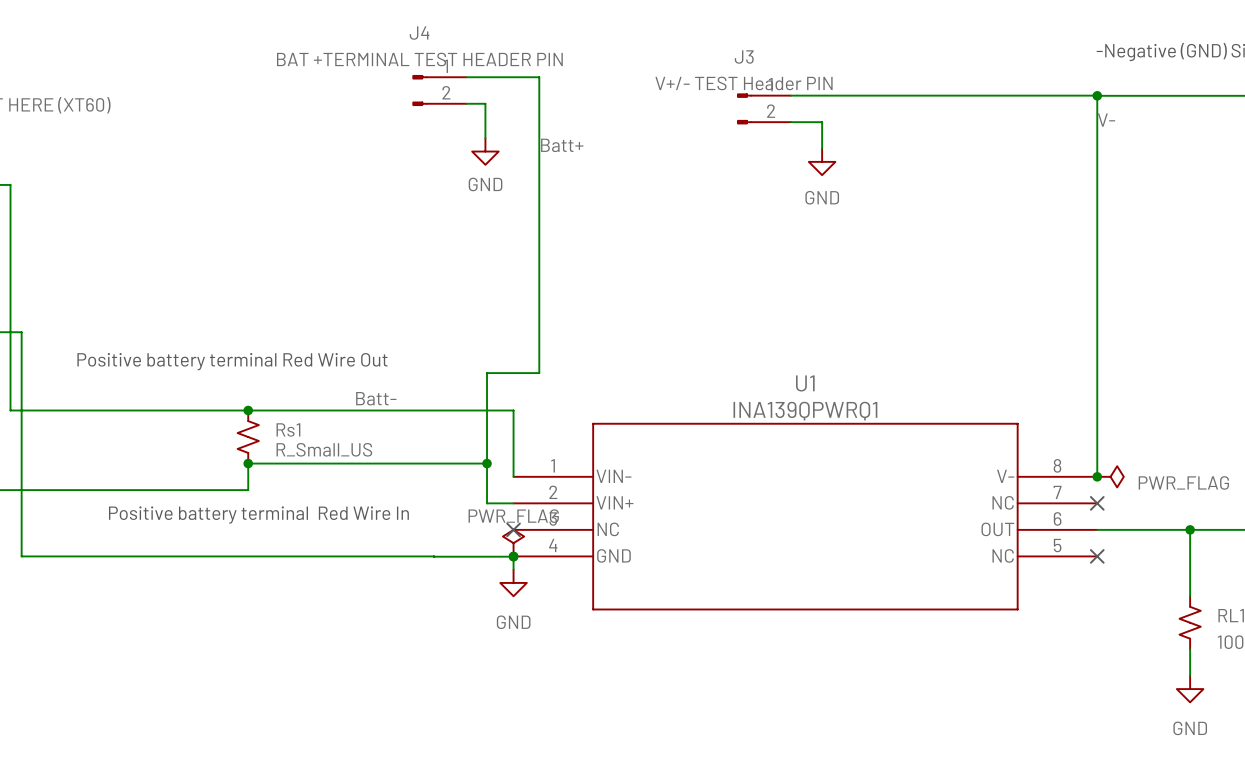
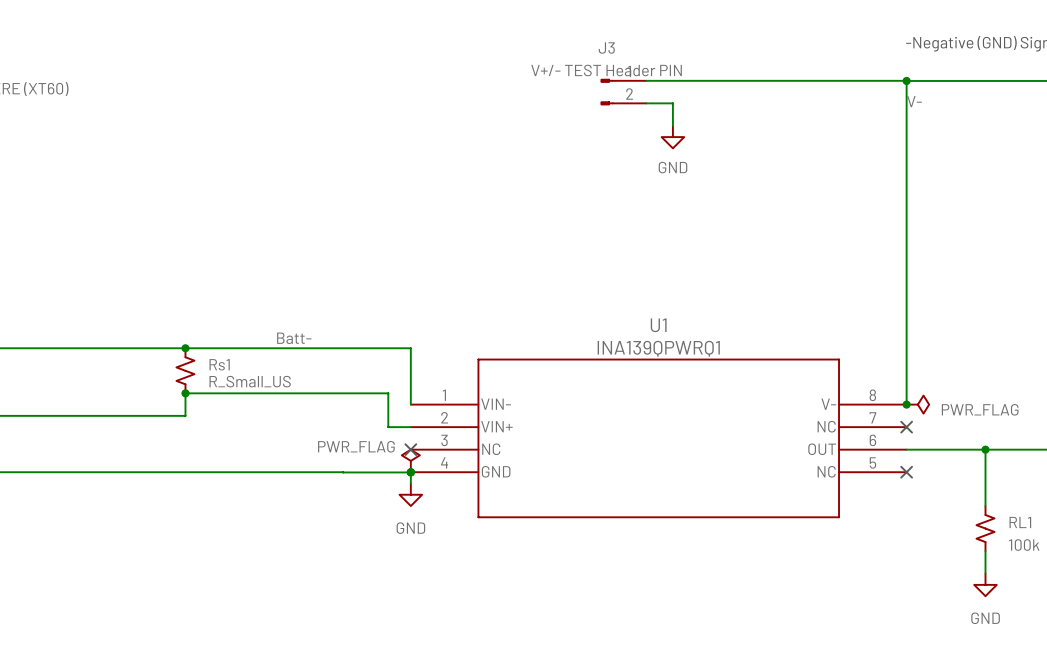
wire: (466, 77) (539, 77) (539, 373) (487, 373) (487, 463) -> none
J4: BAT +TERMINAL TEST HEADER PIN (439, 90) -> none
wire: (466, 103) (485, 103) (485, 138) -> none
label: Batt+ (562, 145) -> none
power symbol: GND (485, 151) -> none
text: Positive battery terminal Red Wire Out (232, 361) -> none
junction: (487, 463) -> none
text: Positive battery terminal Red Wire In (258, 514) -> none
power symbol text position: PWR_FLAG (513, 516) -> PWR_FLAG (356, 446)

